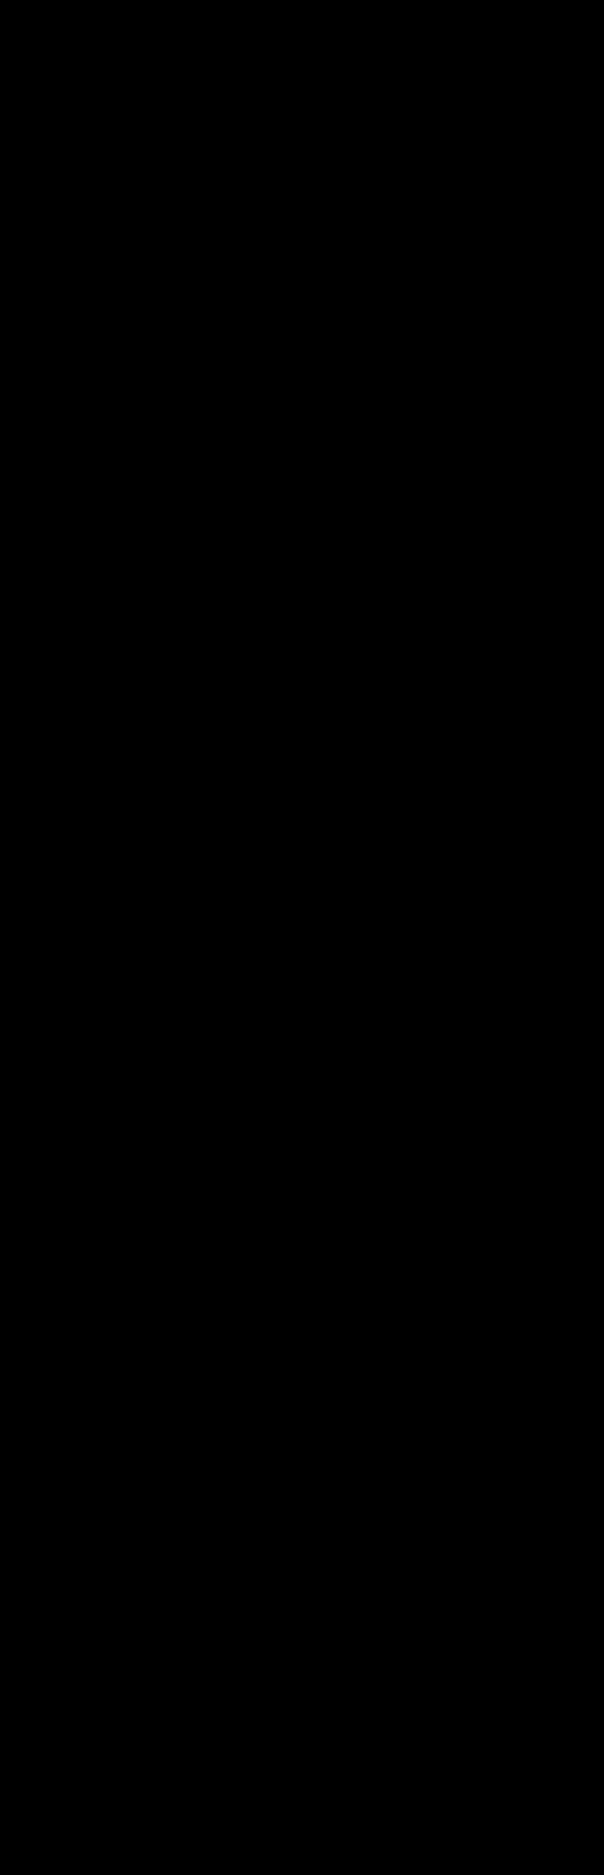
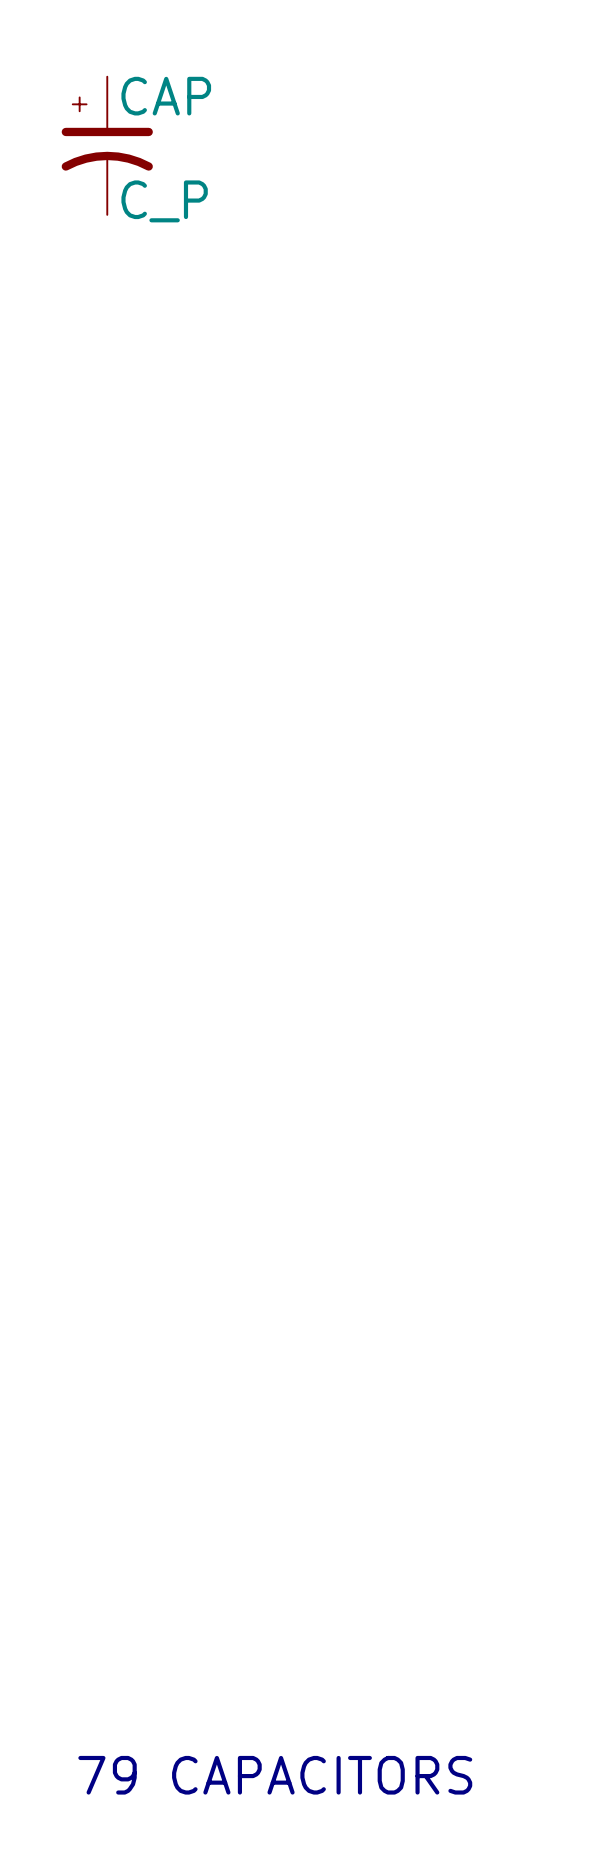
CAP: none -> C_P (107, 145)
text: none -> 79 CAPACITORS (275, 1775)

